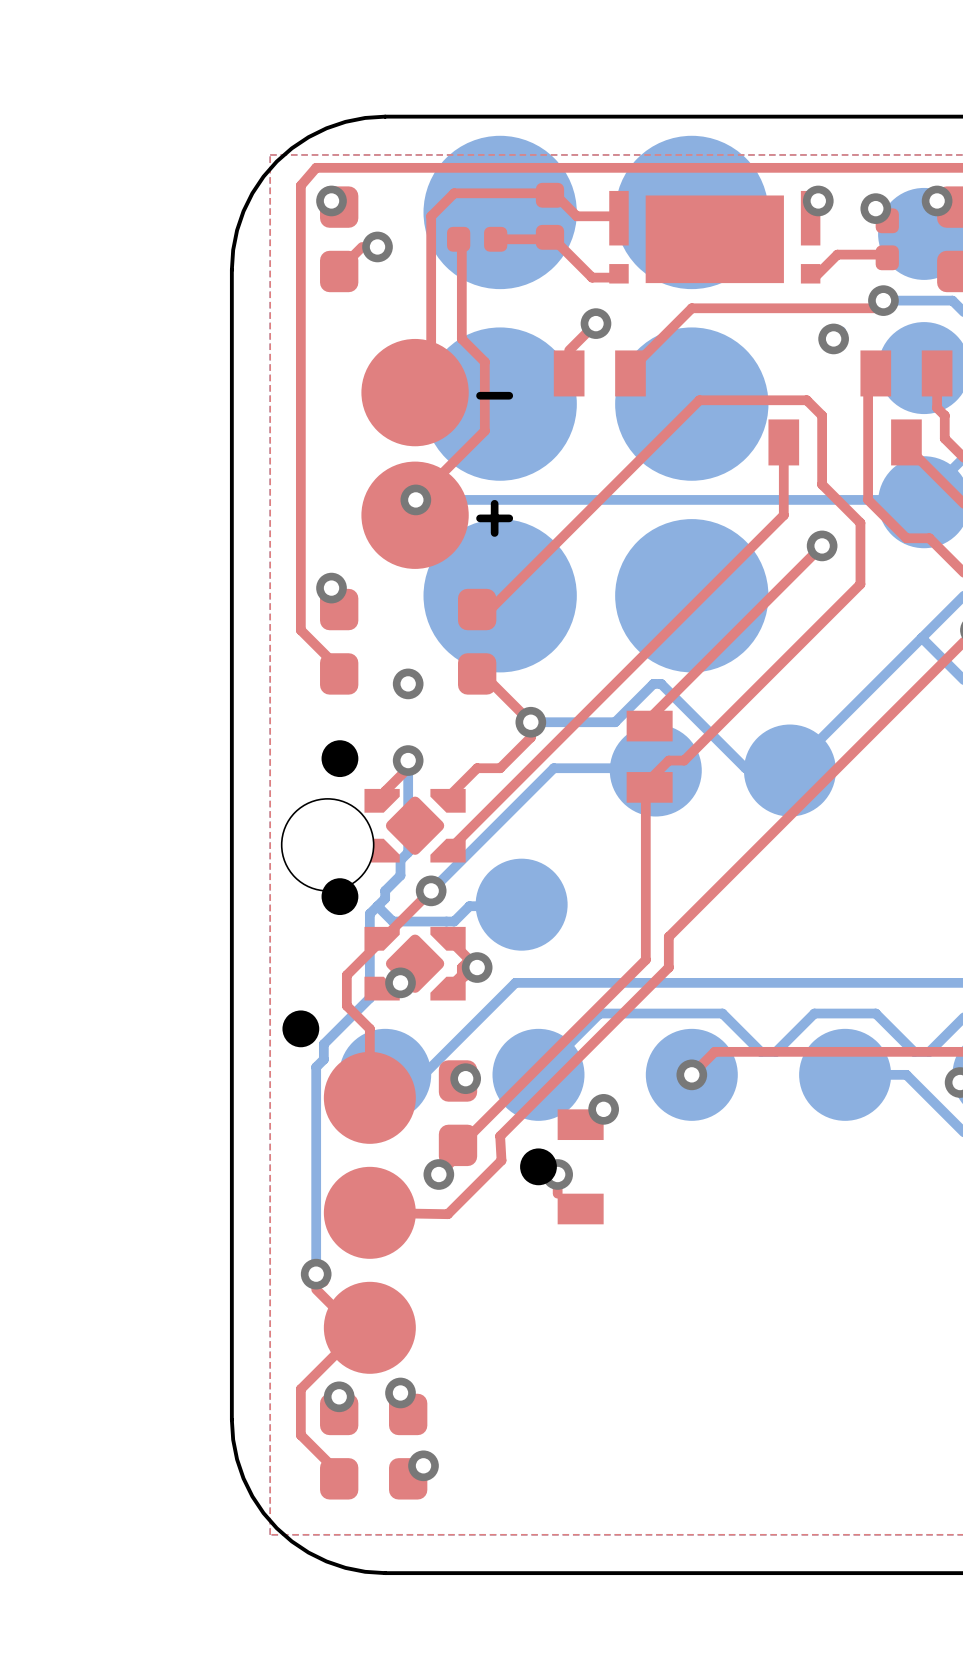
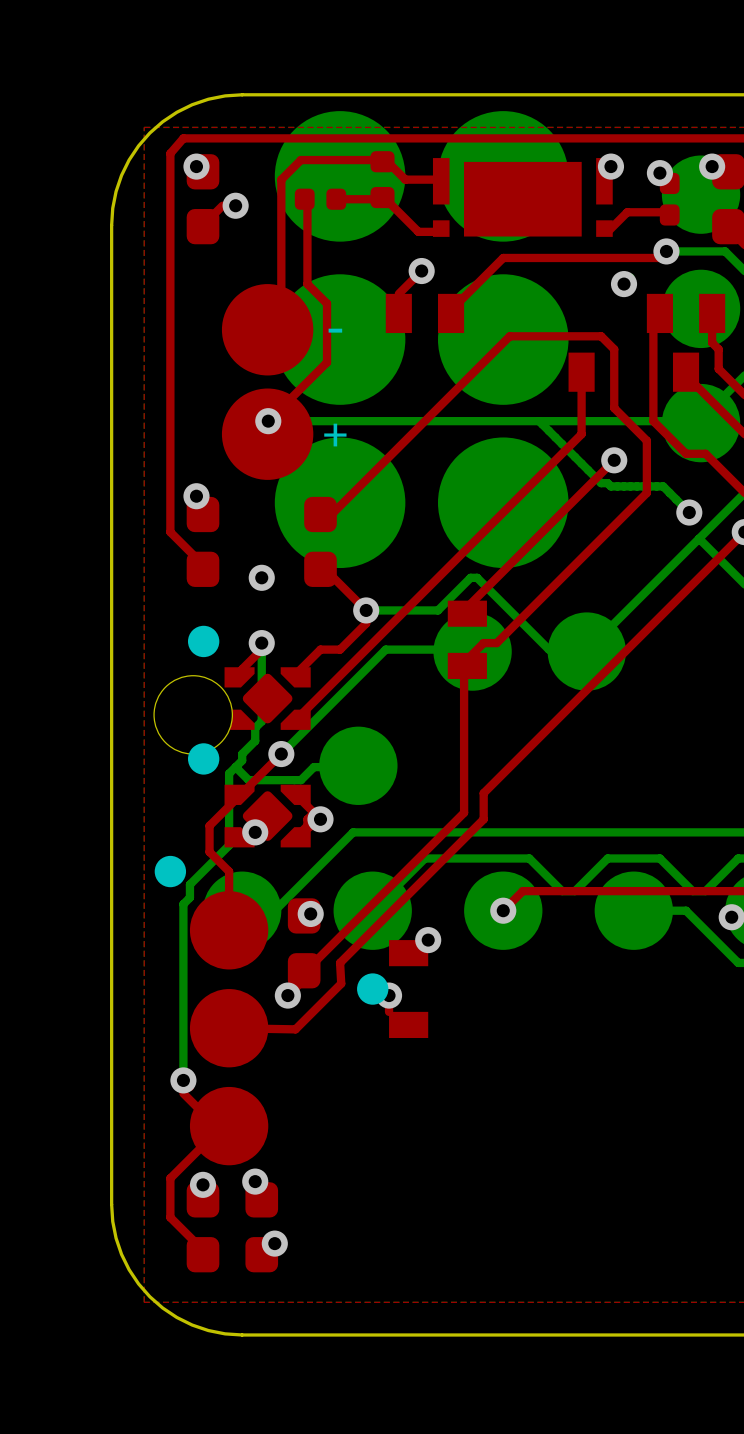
bottom track: none -> (539, 421) (601, 483) (607, 483) (610, 486) (663, 486) (689, 512)
via: none -> (689, 512)

